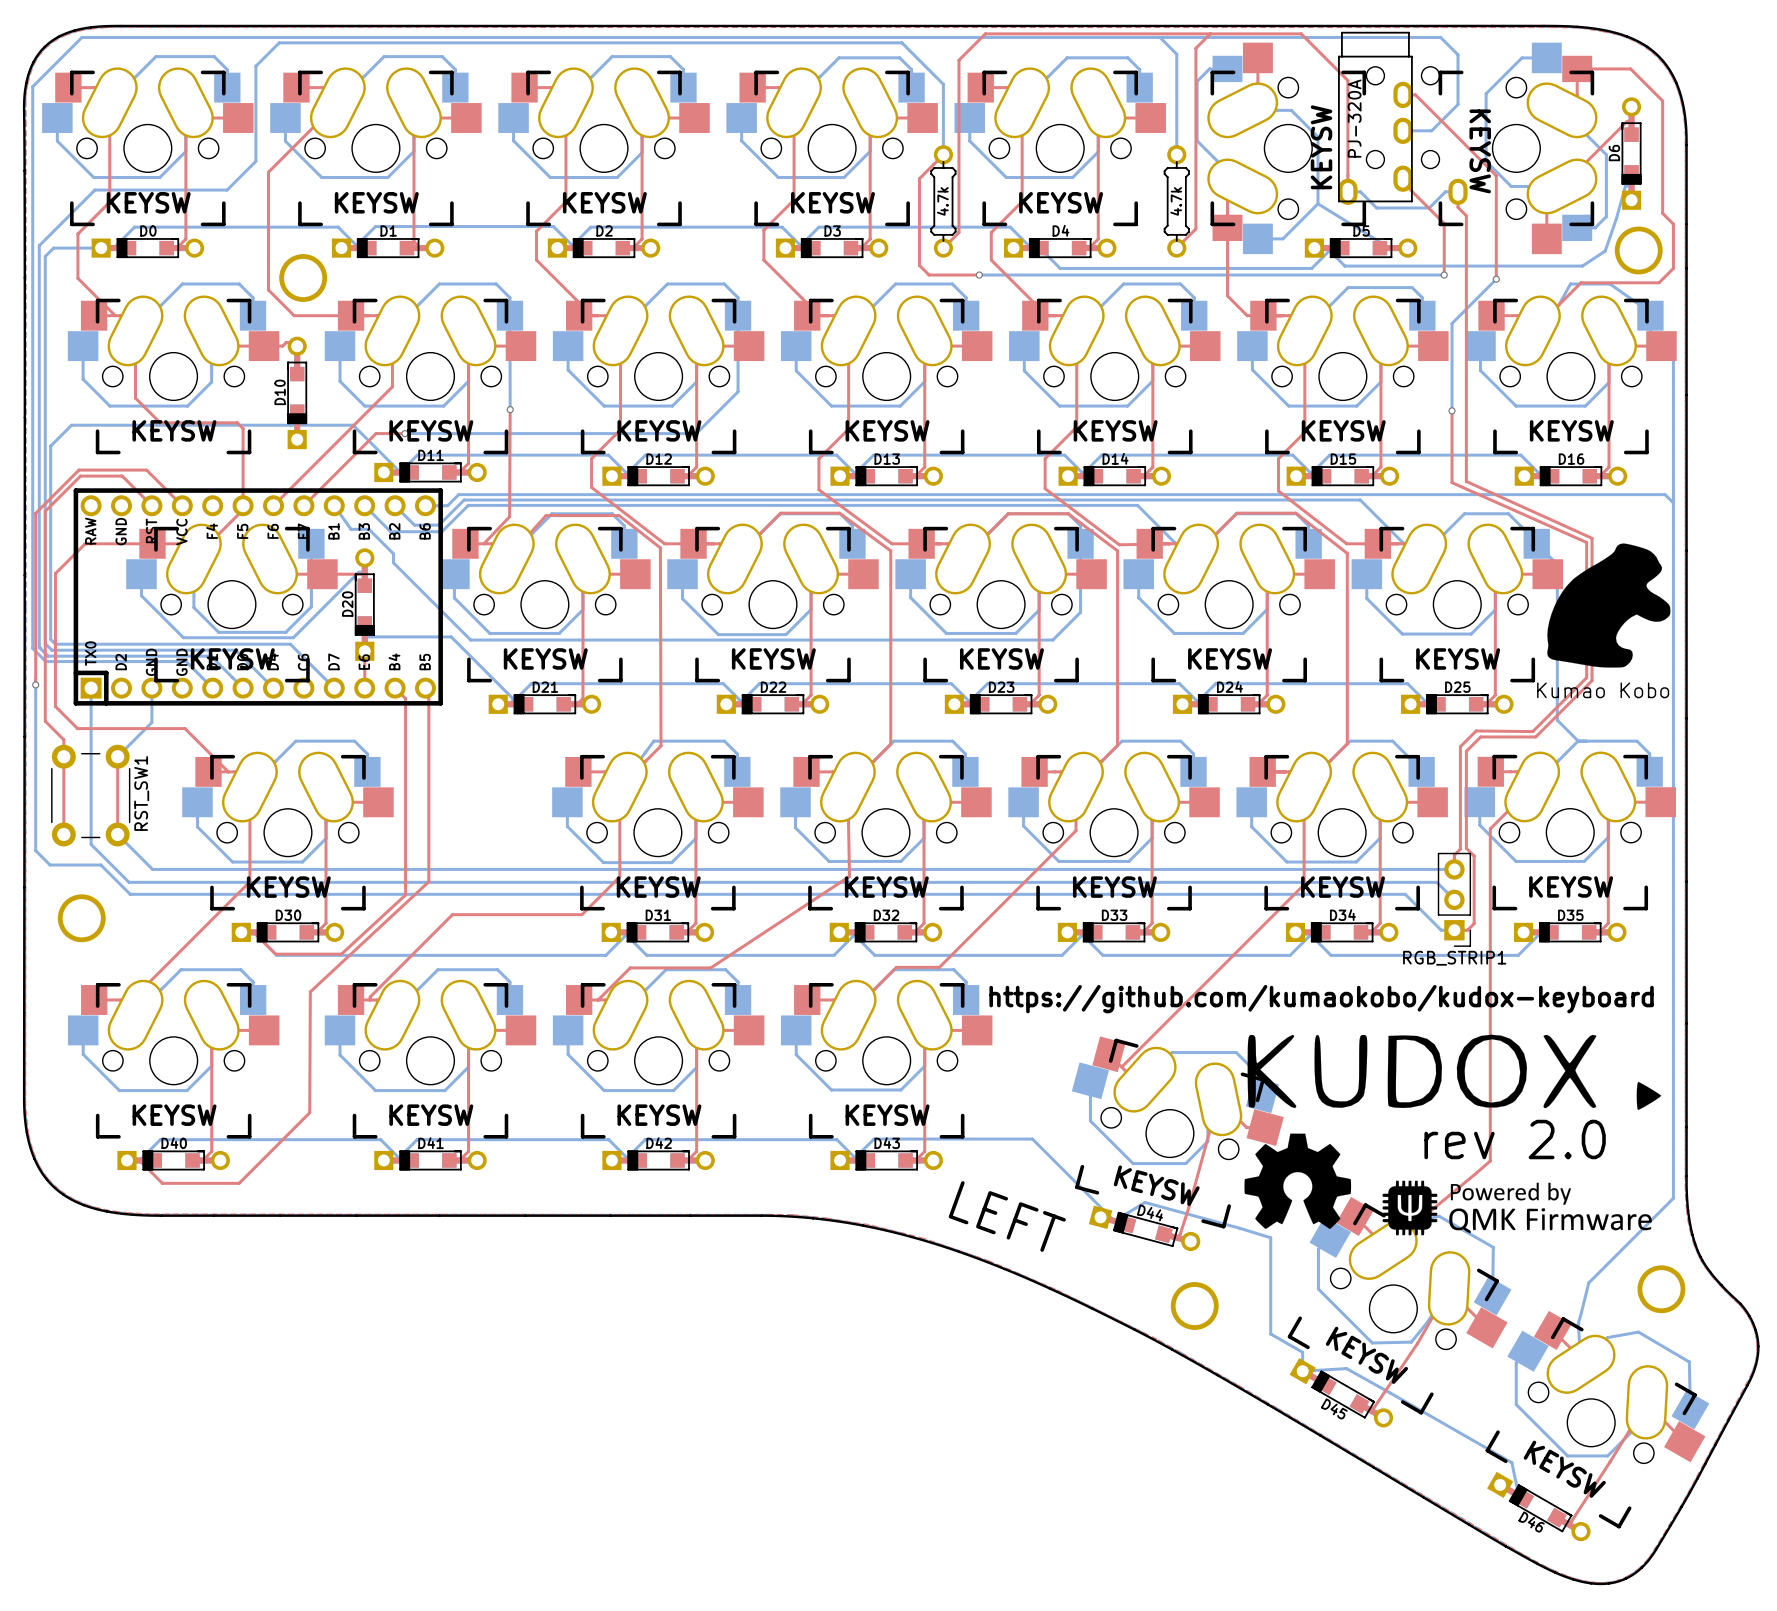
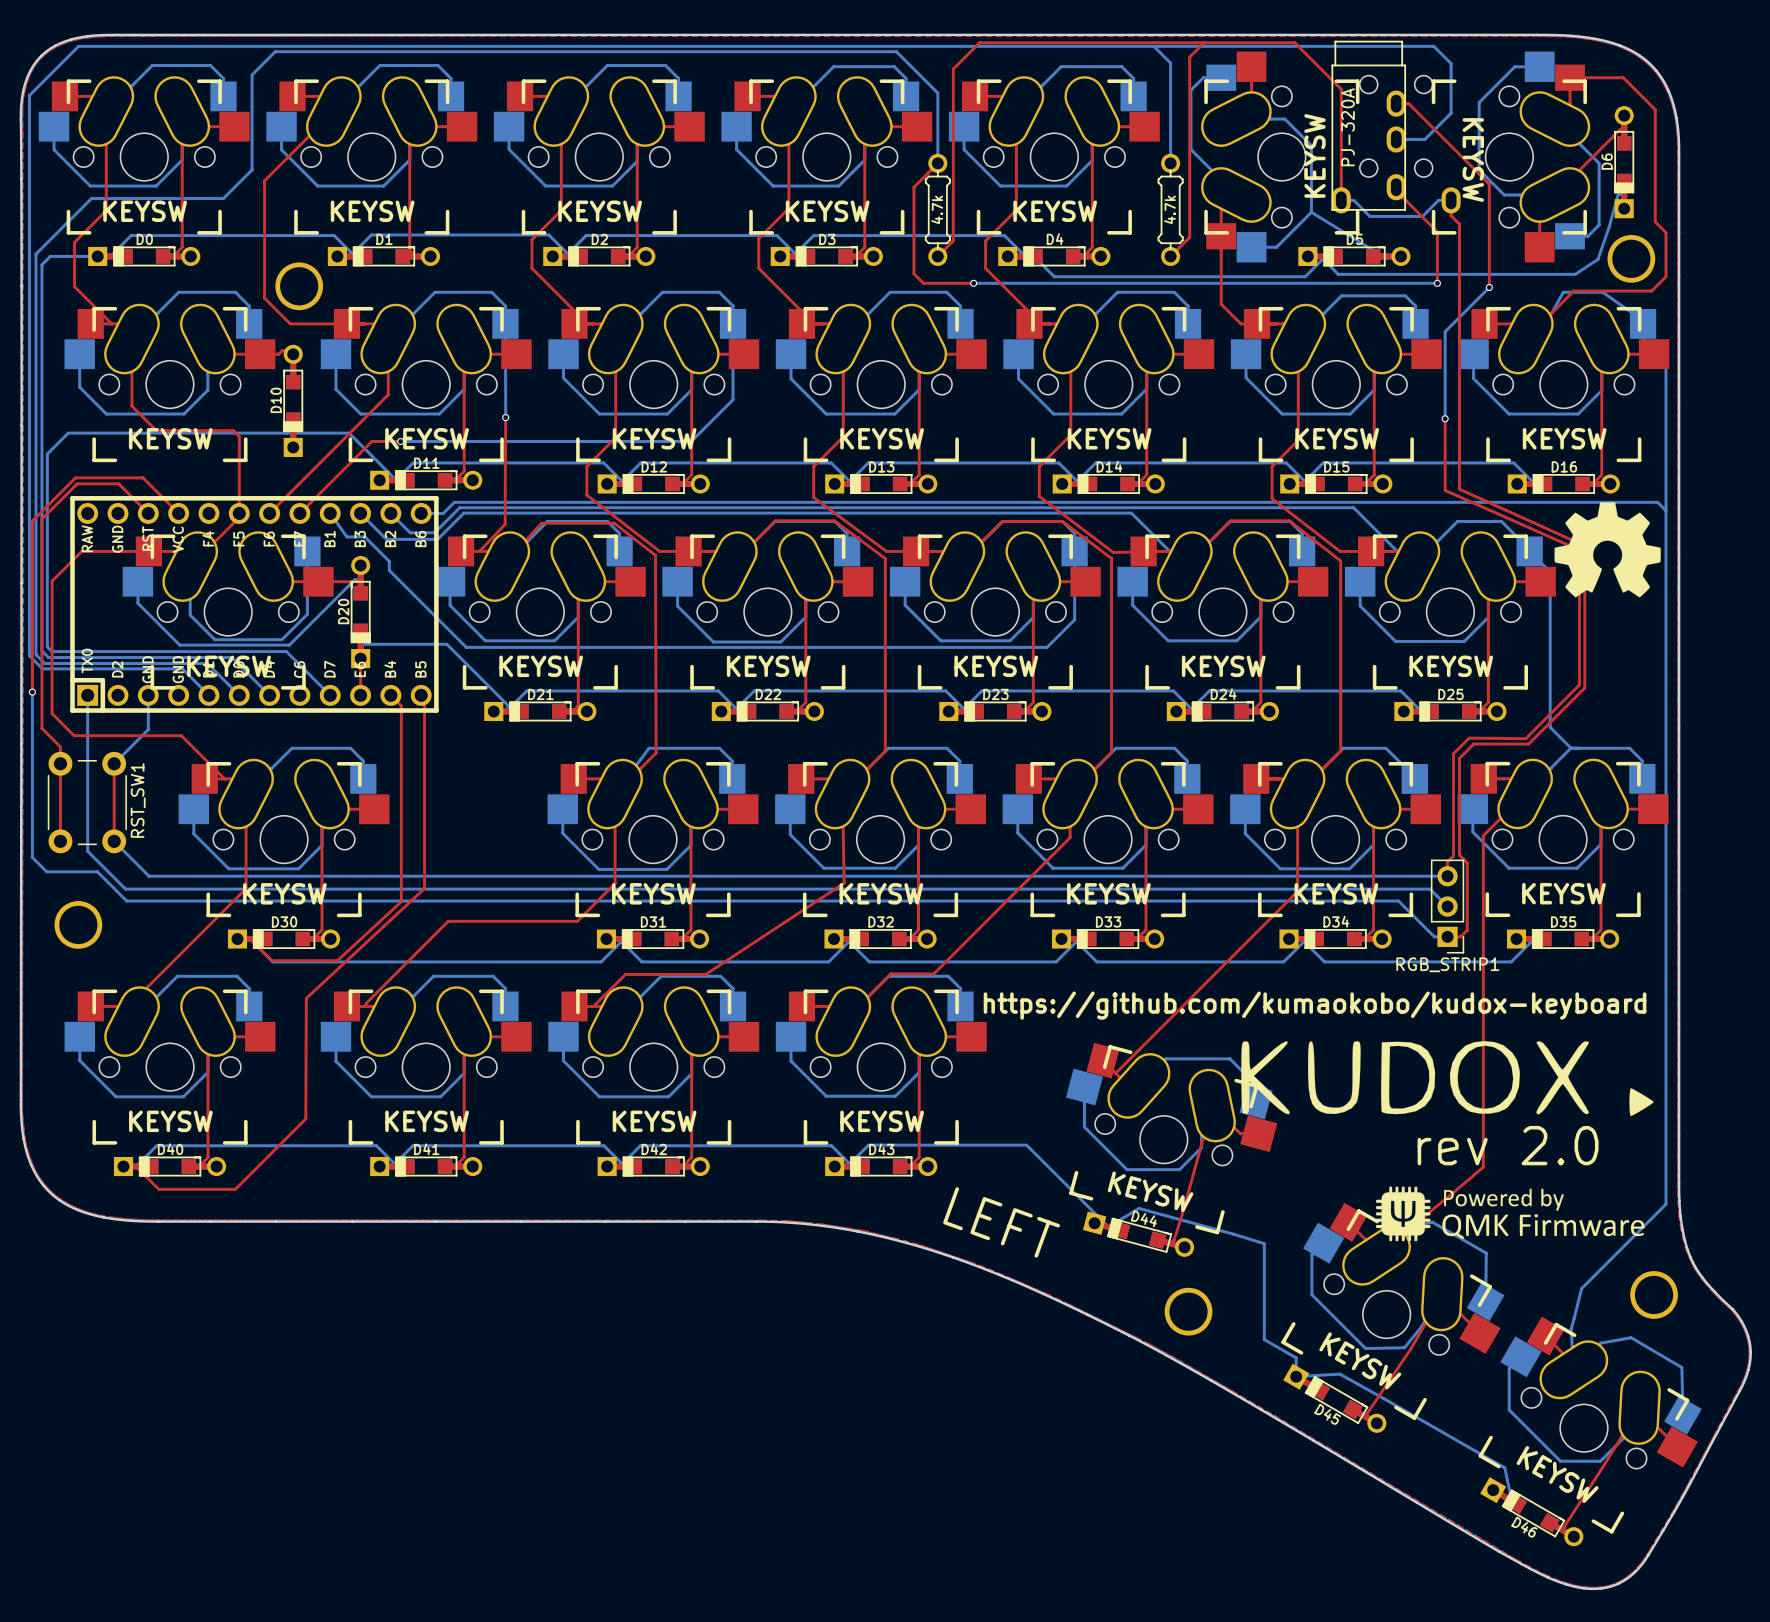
drawing: none -> [1554, 502, 1661, 598]
drawing: [1547, 543, 1671, 668] -> none
text: Kumao Kobo (1603, 690) -> none
drawing: [1244, 1133, 1352, 1229] -> none

